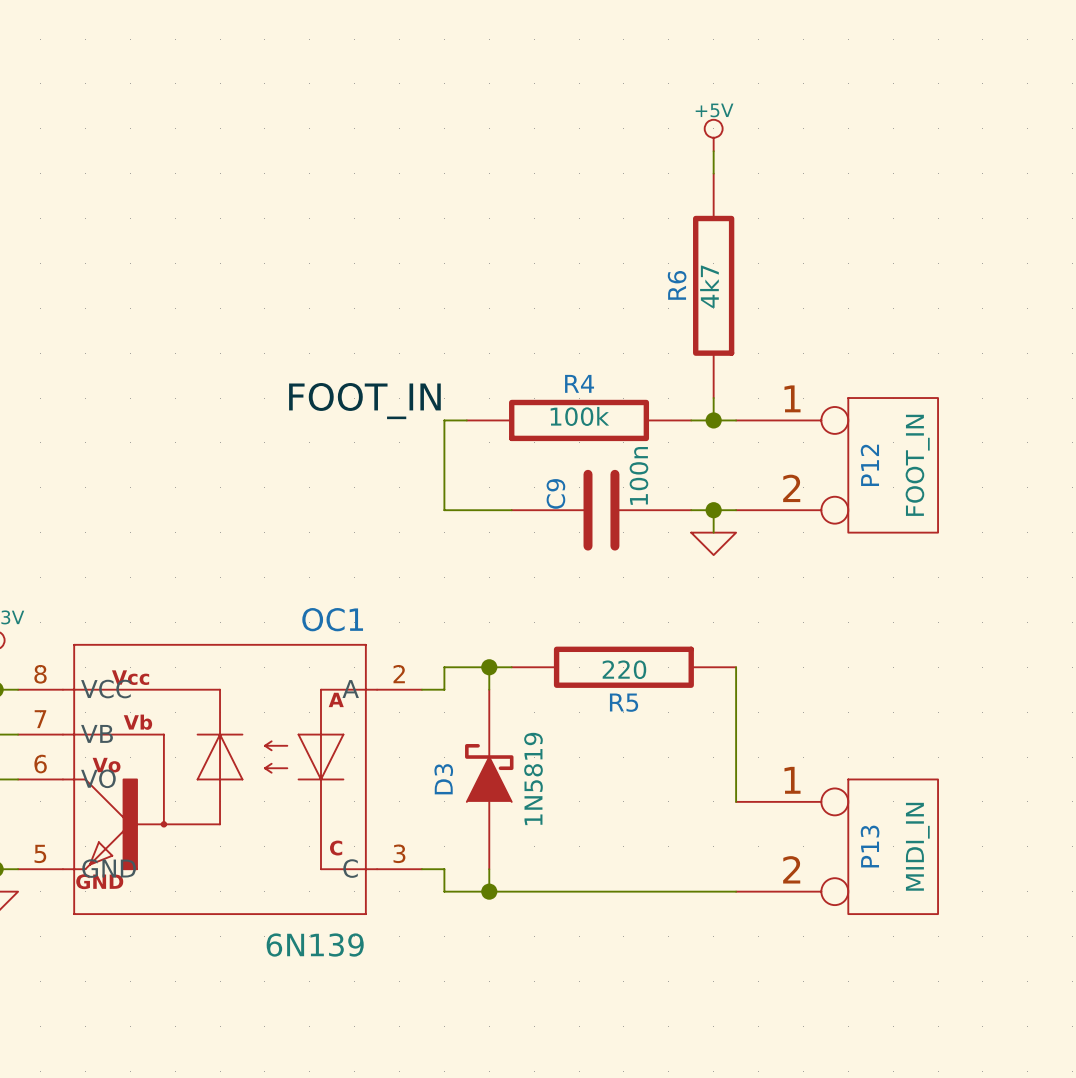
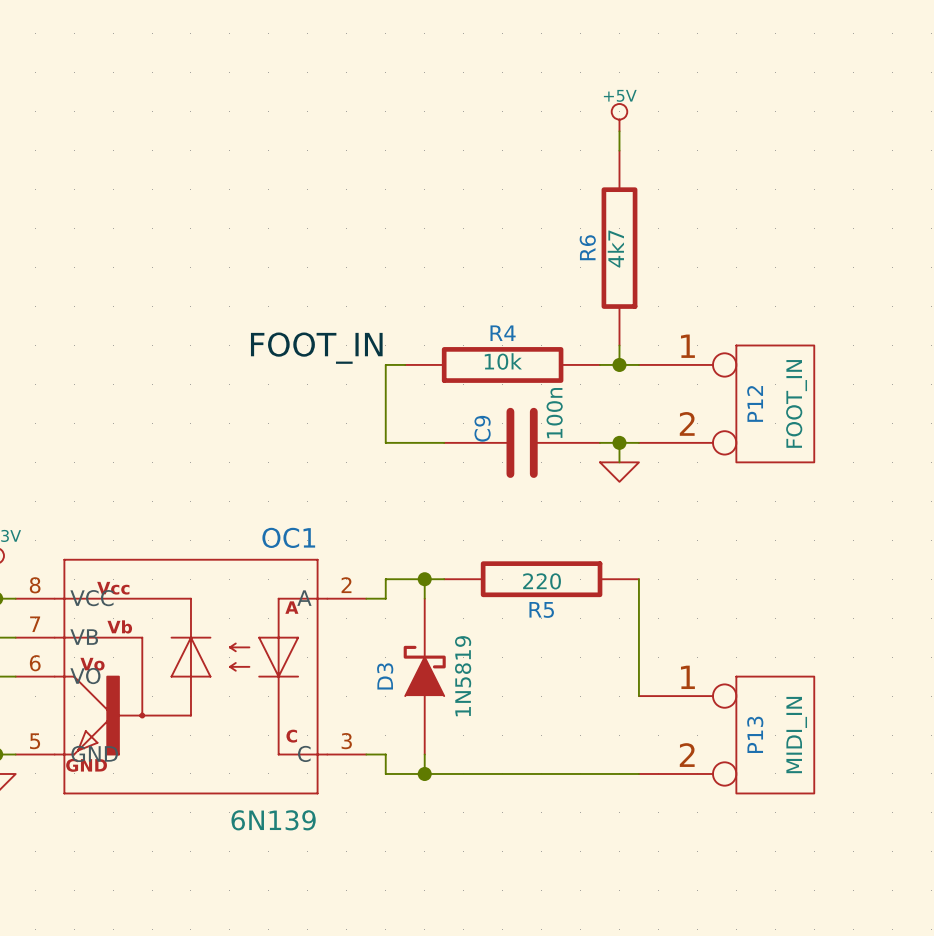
R4 value: 100k (579, 416) -> 10k (503, 361)

